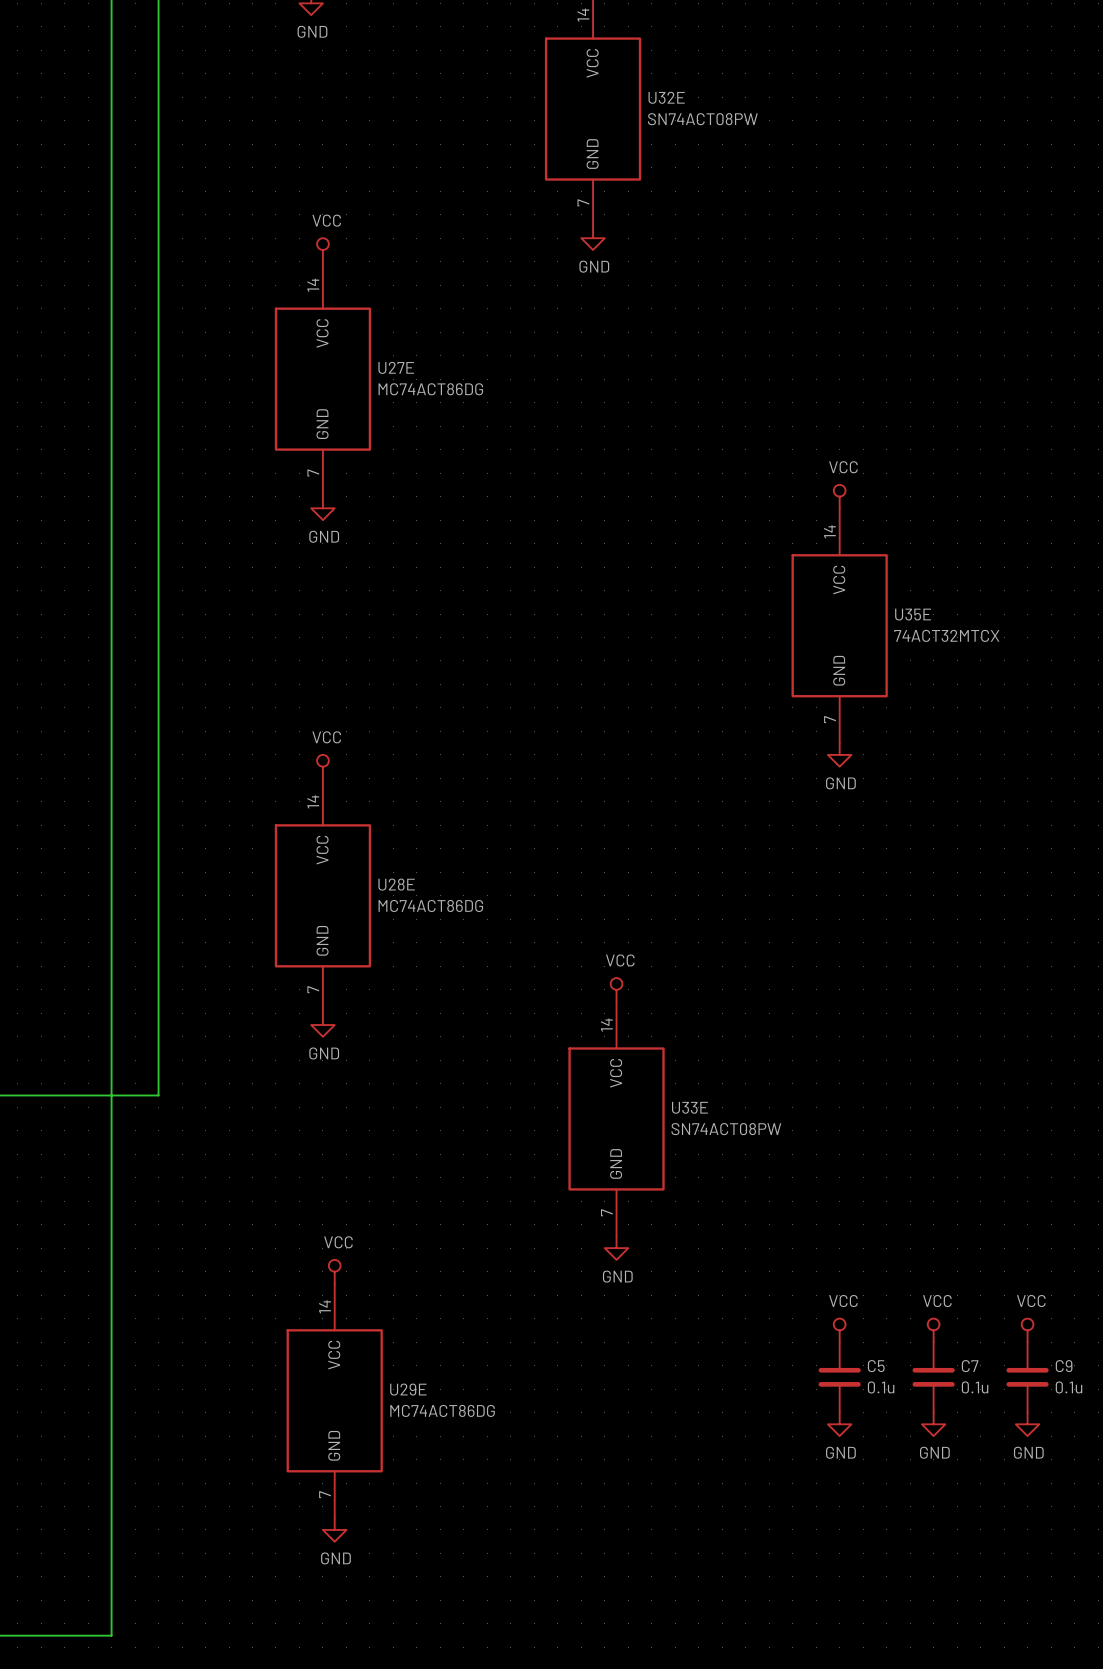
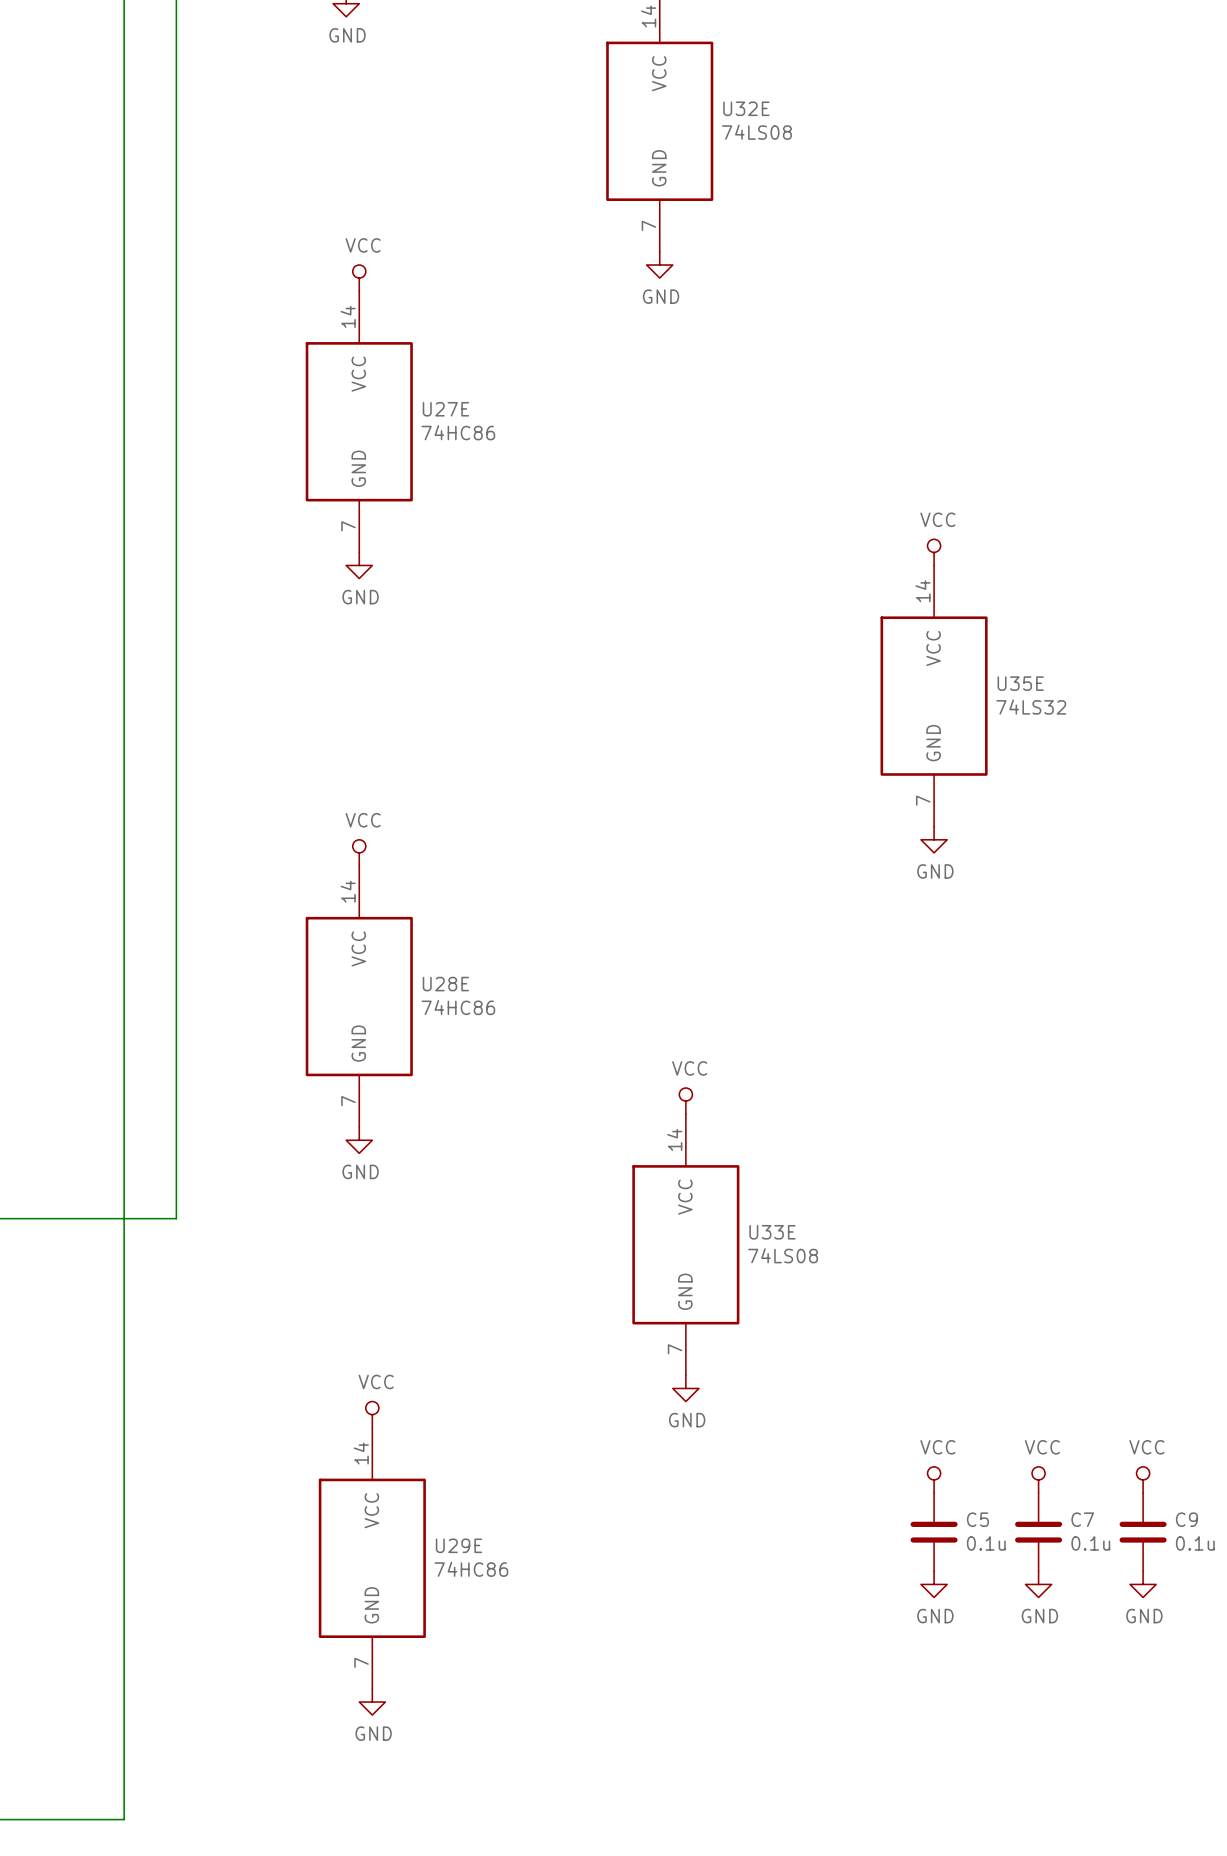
U32E value: SN74ACT08PW (702, 119) -> 74LS08 (756, 132)
U27E value: MC74ACT86DG (430, 389) -> 74HC86 (458, 432)
U35E value: 74ACT32MTCX (946, 635) -> 74LS32 (1031, 707)
U28E value: MC74ACT86DG (430, 905) -> 74HC86 (458, 1007)
U33E value: SN74ACT08PW (726, 1129) -> 74LS08 (783, 1255)
U29E value: MC74ACT86DG (442, 1410) -> 74HC86 (471, 1569)

